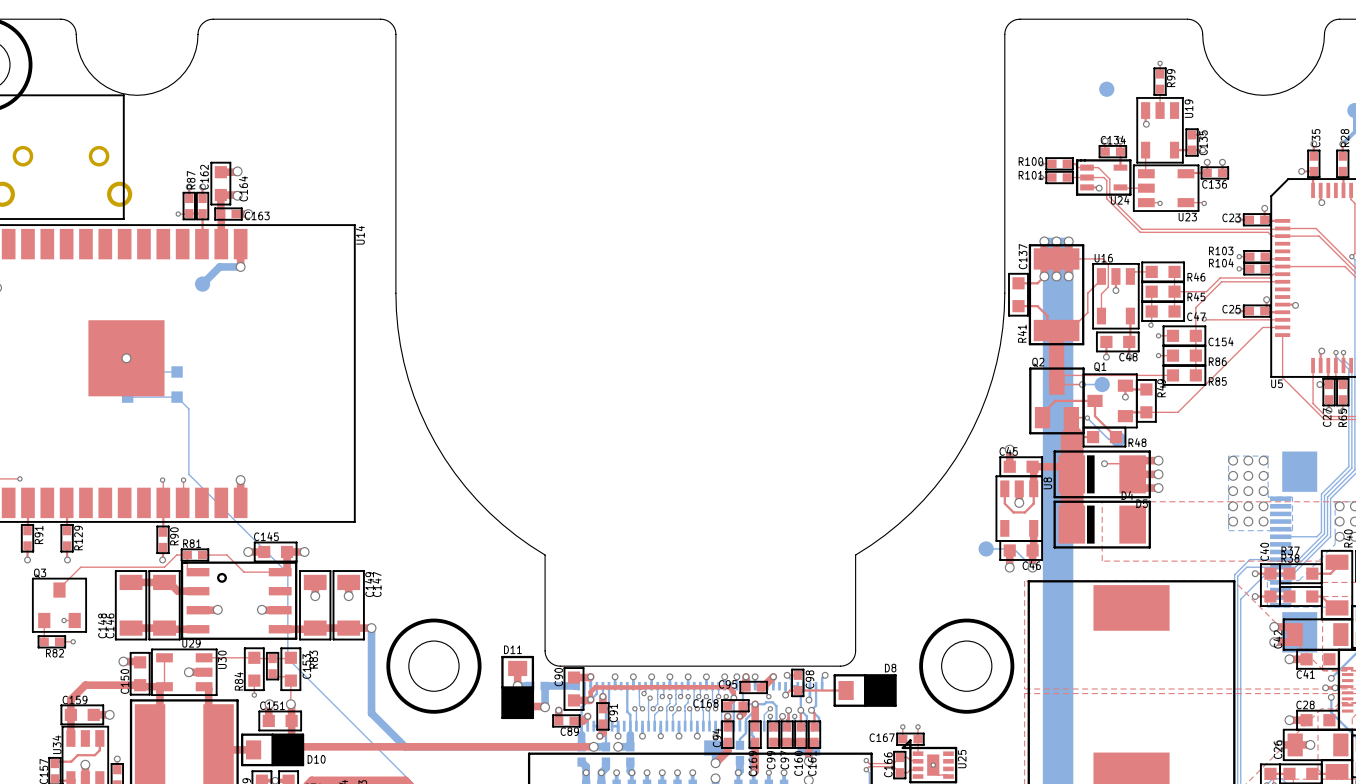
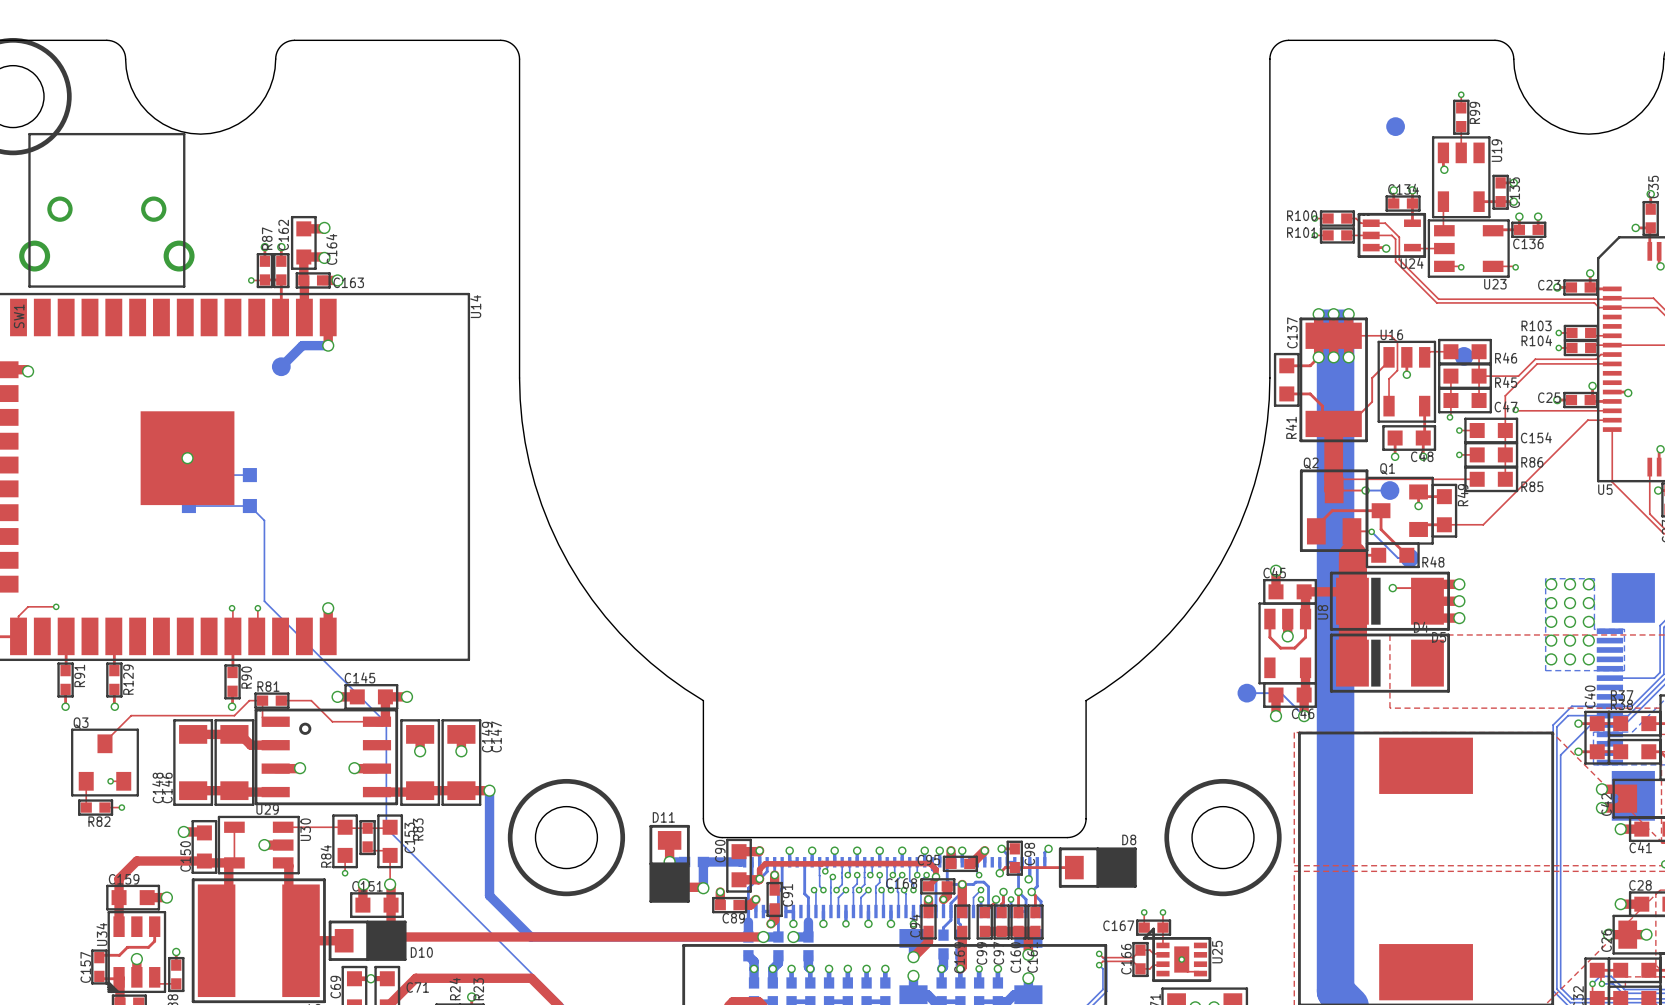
part: none -> (1464, 356)

